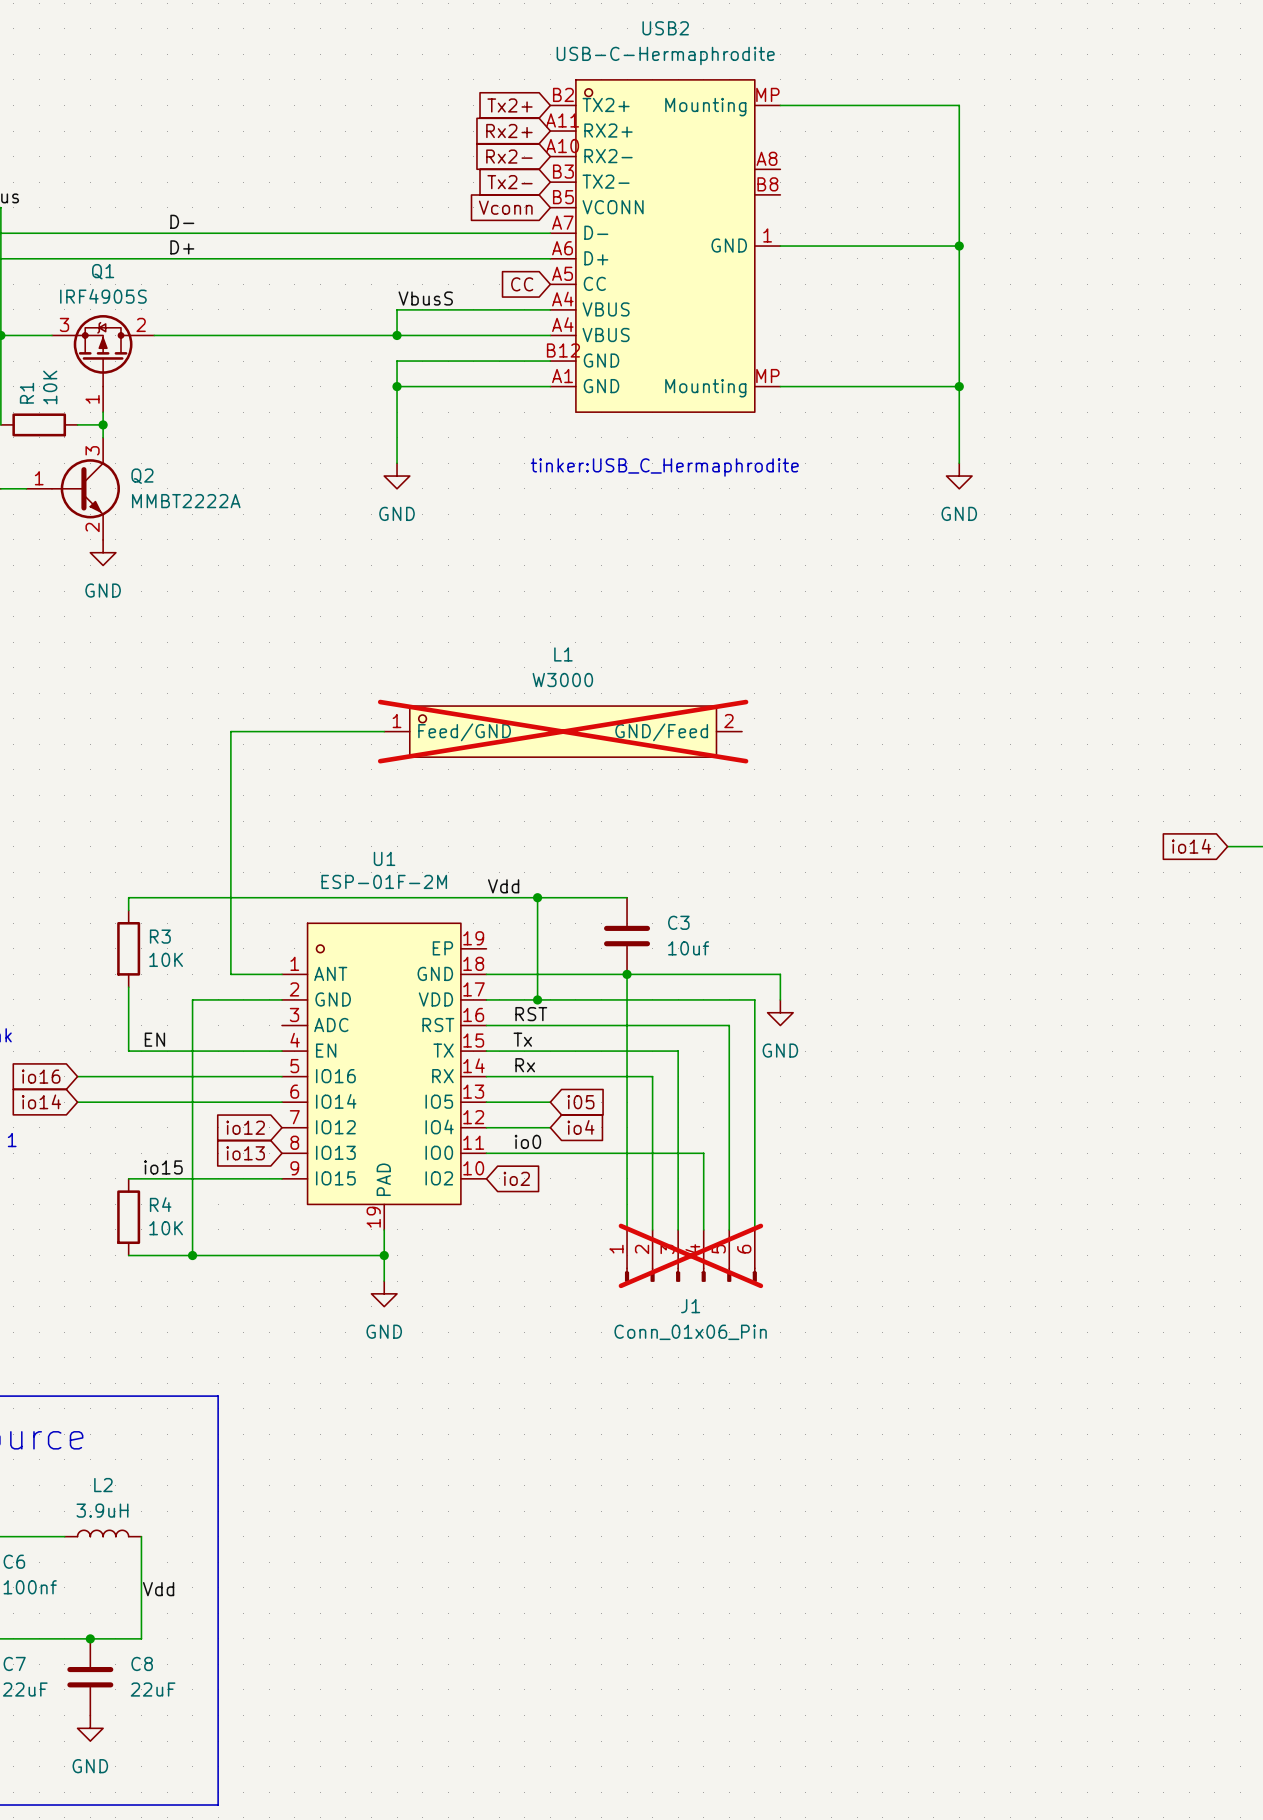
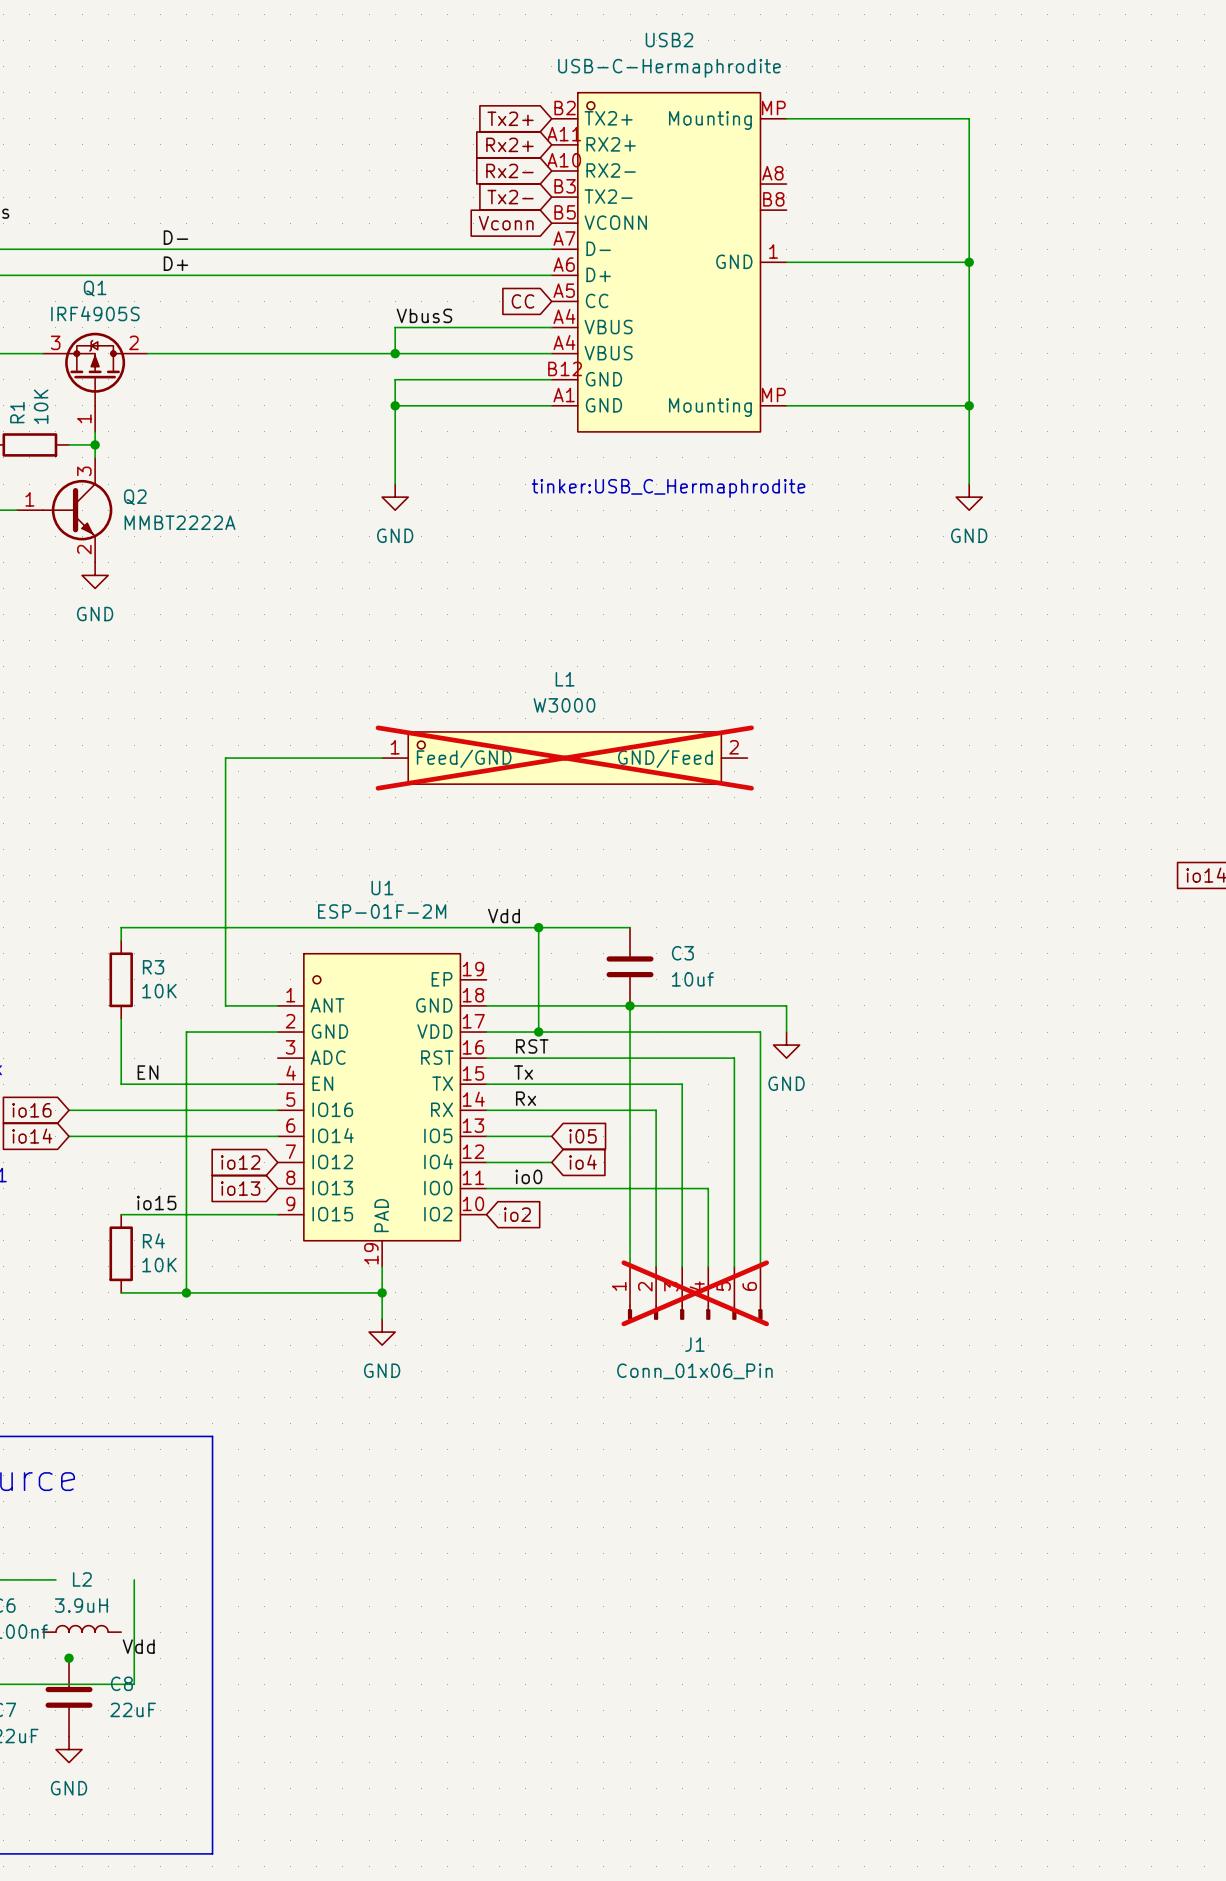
L2 position: (103, 1533) -> (82, 1628)
label position: Vdd (158, 1589) -> Vdd (138, 1646)
junction position: (90, 1638) -> (69, 1658)
C8 position: (90, 1677) -> (69, 1697)
power symbol position: GND (90, 1728) -> GND (69, 1749)

